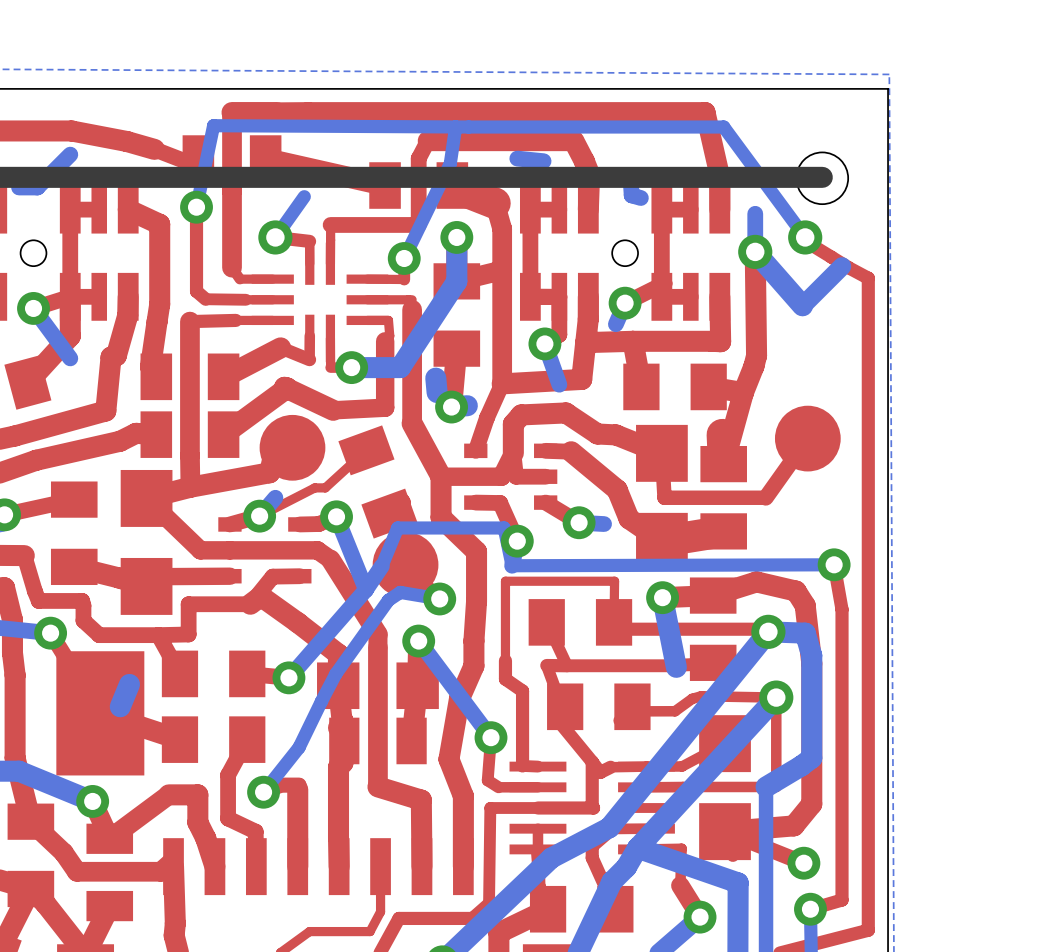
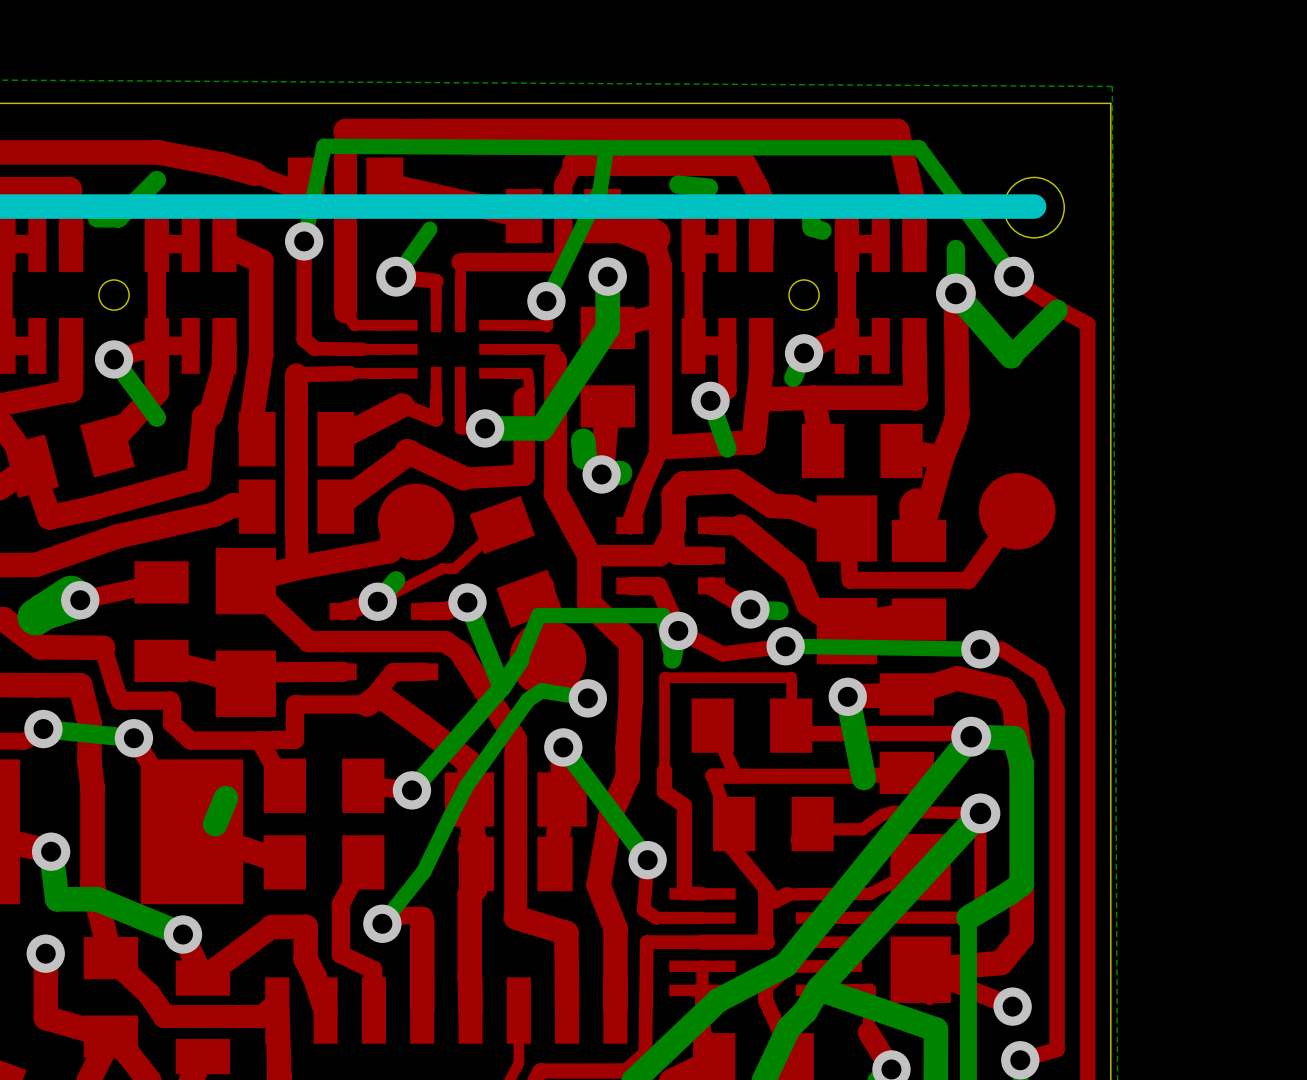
top track: none -> (678, 630) (722, 653) (785, 646)
bottom track: none -> (785, 646) (980, 649)
via: none -> (785, 646)
top track: (834, 564) (842, 609) -> (980, 649) (1001, 649) (1040, 673) (1057, 710)
bottom track: (834, 564) (512, 565) -> none
via position: (834, 564) -> (980, 649)

